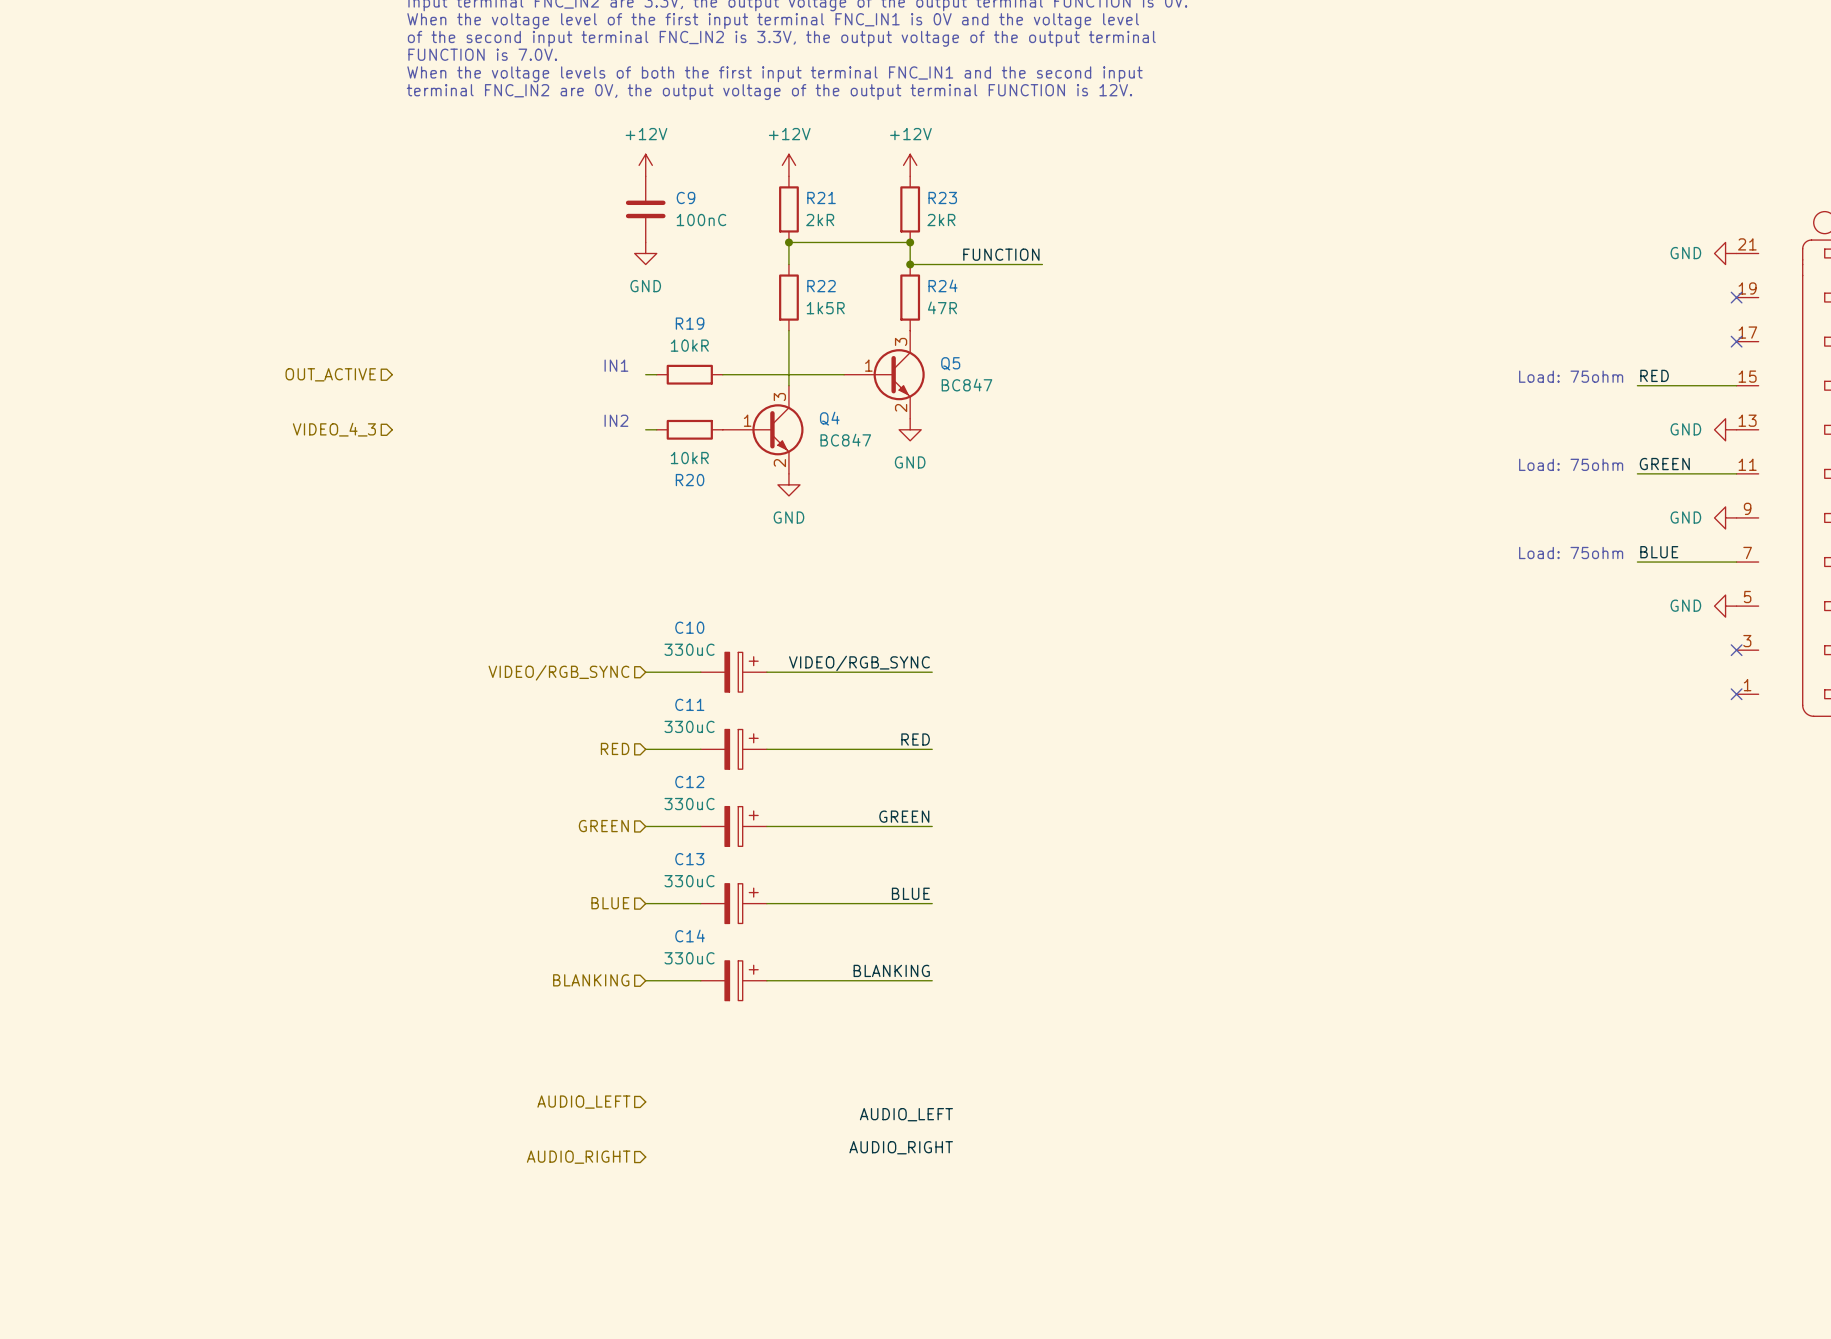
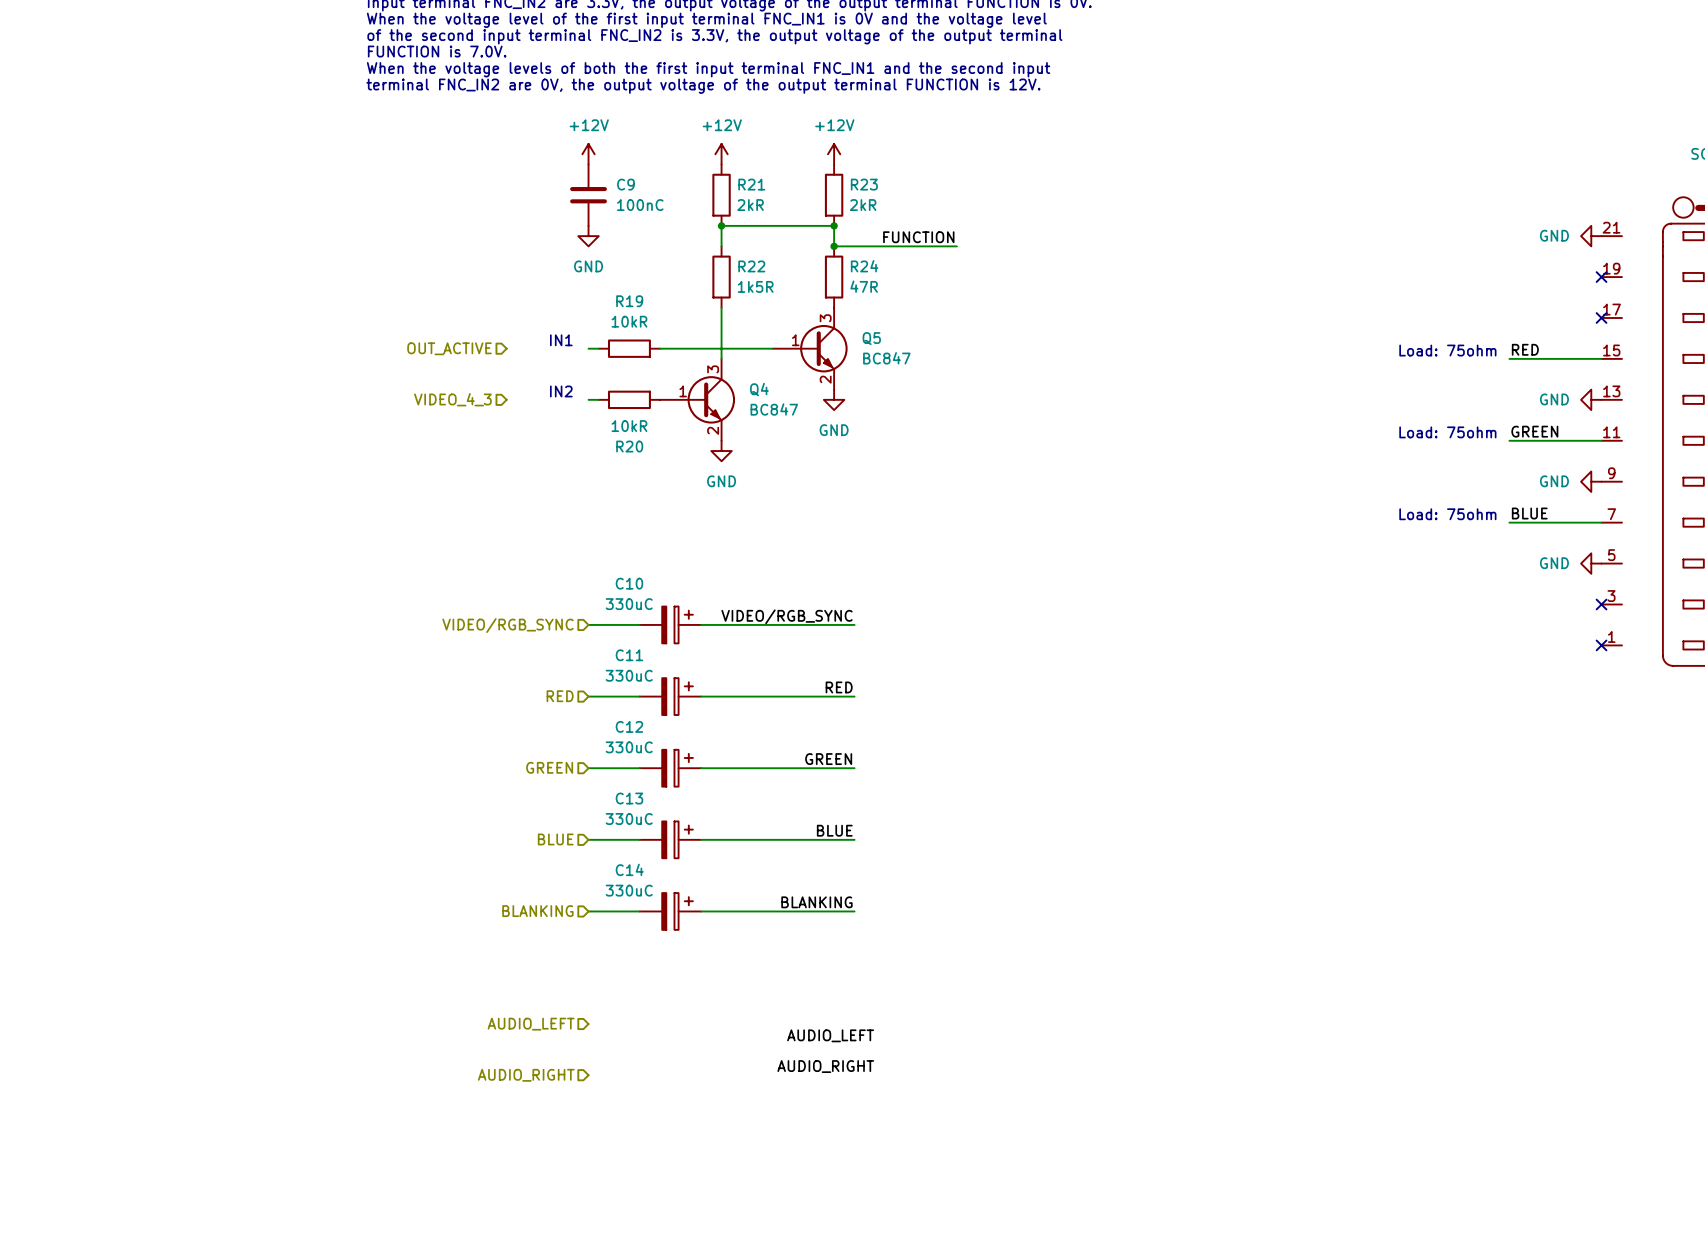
hierarchical label position: OUT_ACTIVE (330, 374) -> OUT_ACTIVE (449, 348)
hierarchical label position: VIDEO_4_3 (334, 429) -> VIDEO_4_3 (452, 399)

